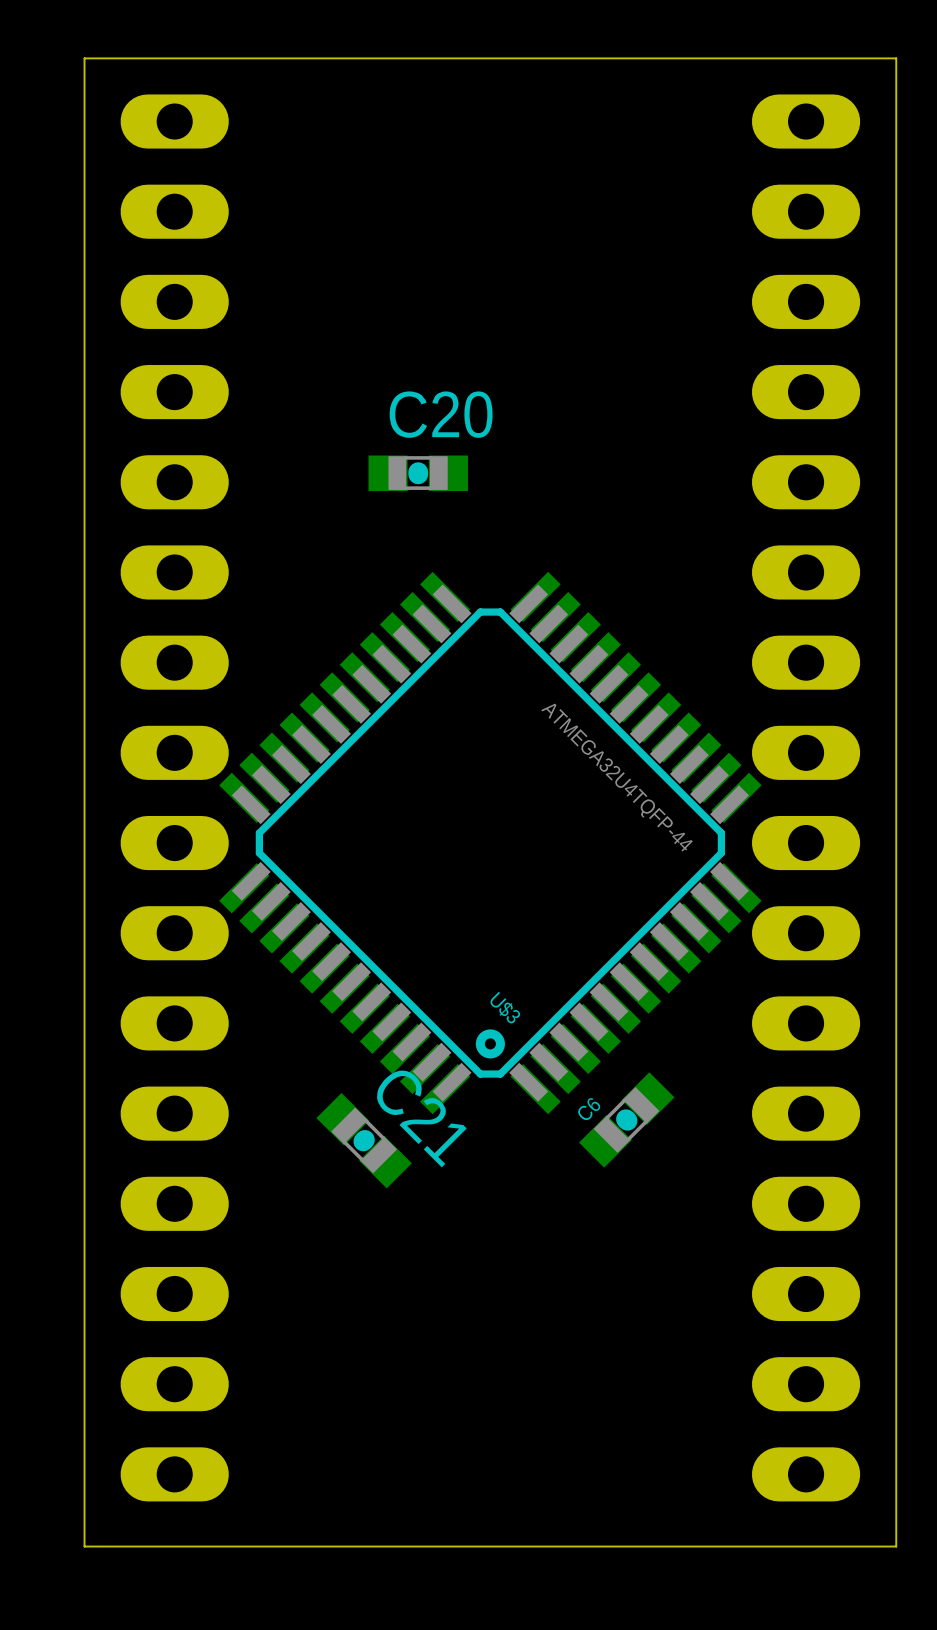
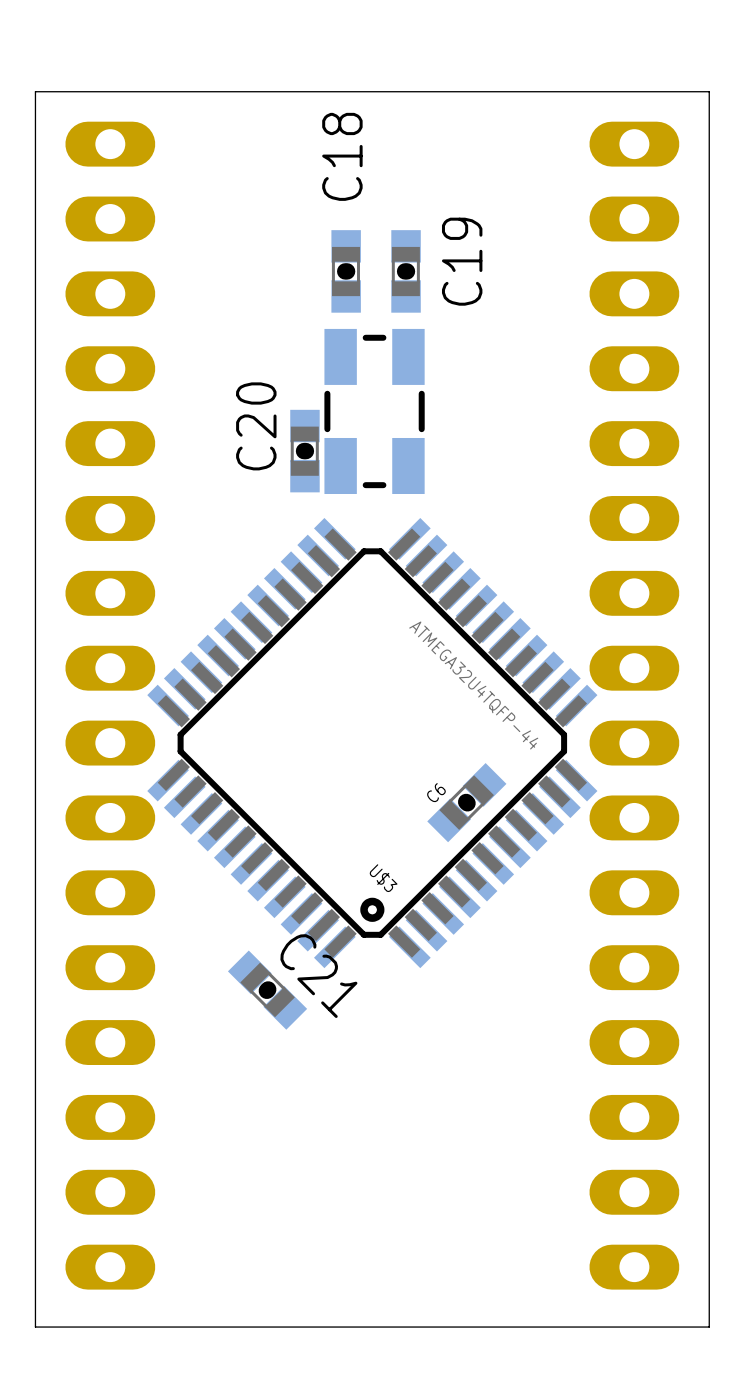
C18: none -> (346, 271)
C19: none -> (406, 271)
C20 name position: C20 (441, 414) -> C20 (256, 426)
part: none -> (374, 411)
C20 rotation: 0° (418, 473) -> 90° clockwise (304, 451)
C6 position: (626, 1119) -> (466, 802)

